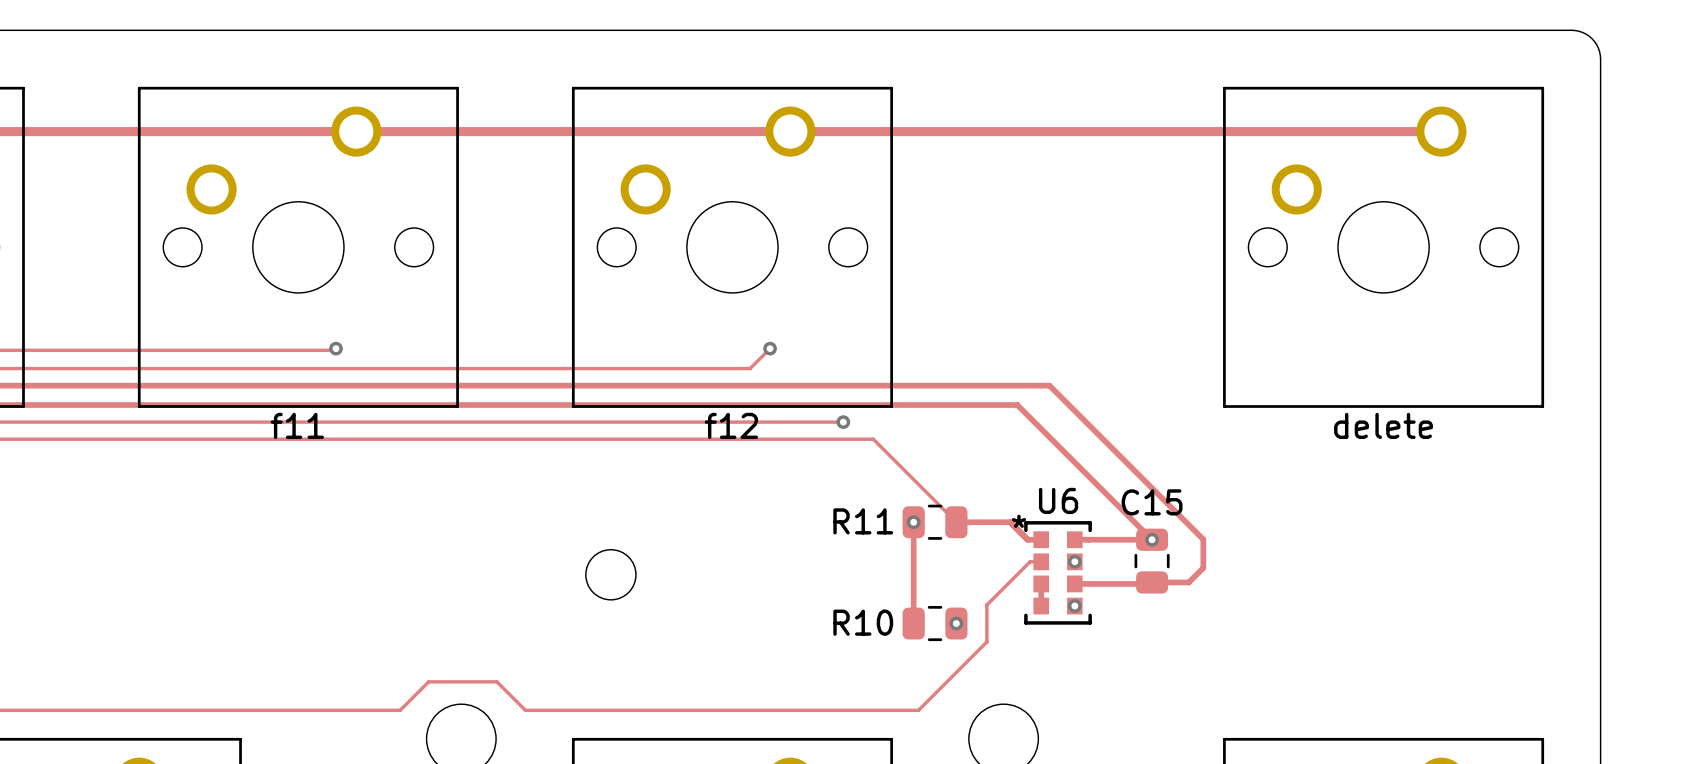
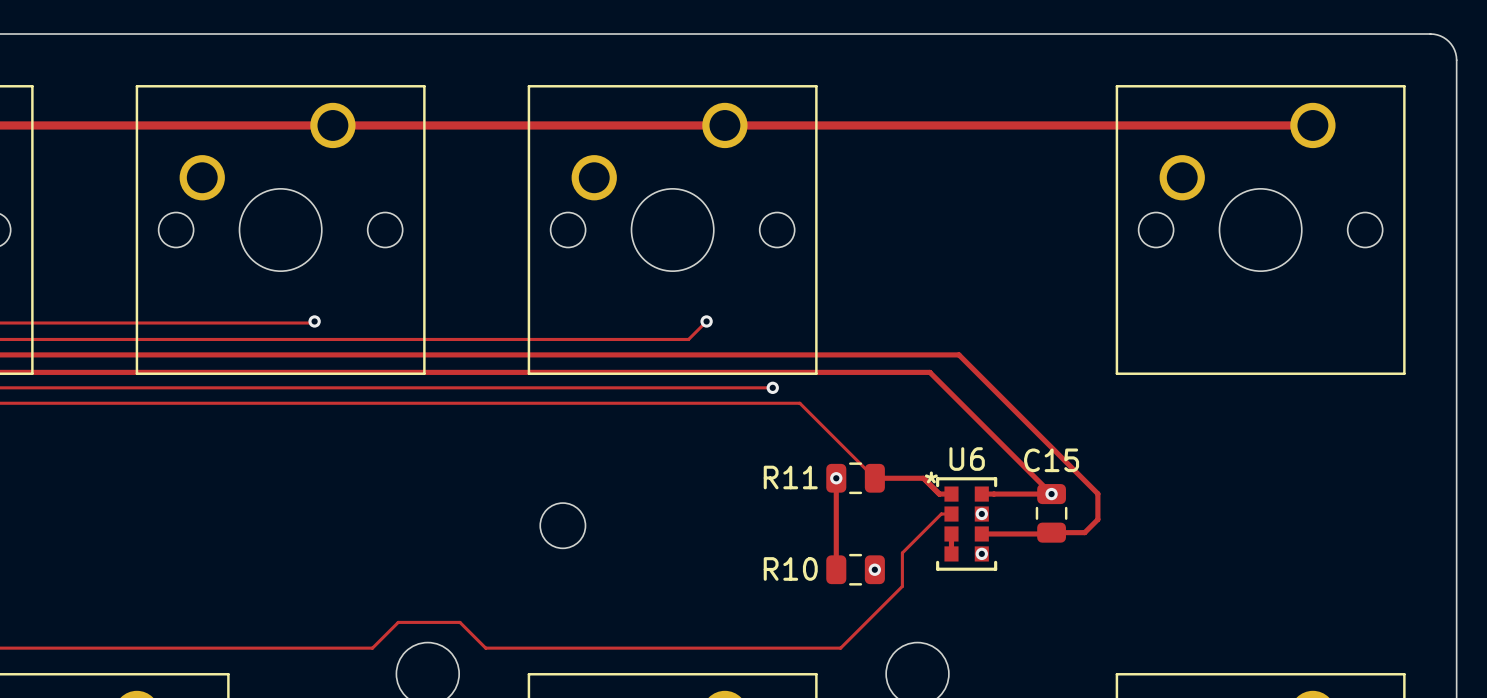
part value: f11 (297, 425) -> none
part value: f12 (731, 425) -> none
part value: delete (1383, 425) -> none

